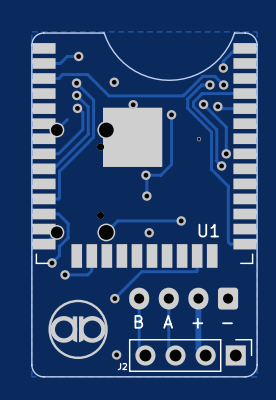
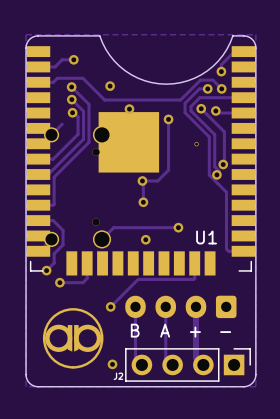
via: (226, 153) -> none
via: none -> (223, 164)
via: (221, 165) -> none
via: none -> (216, 174)

